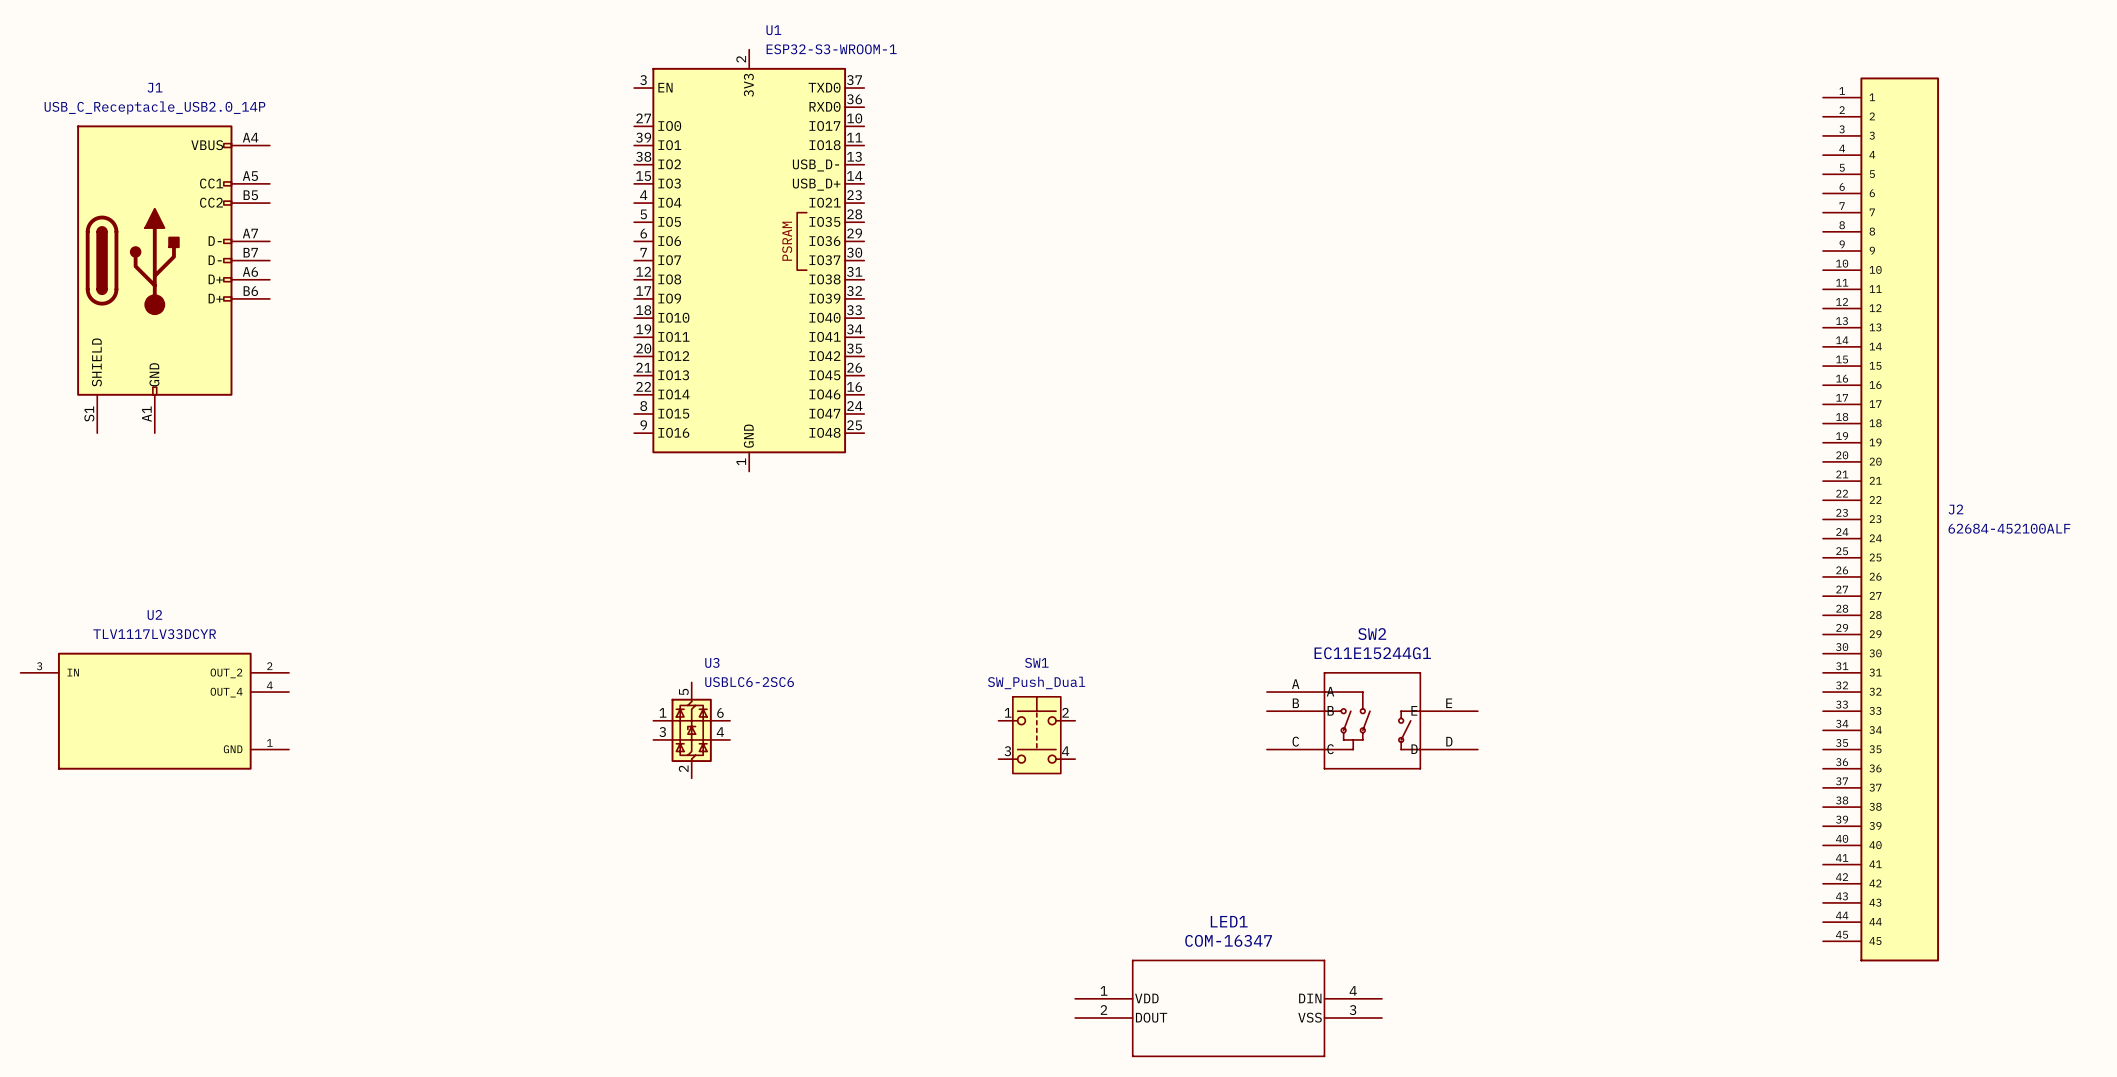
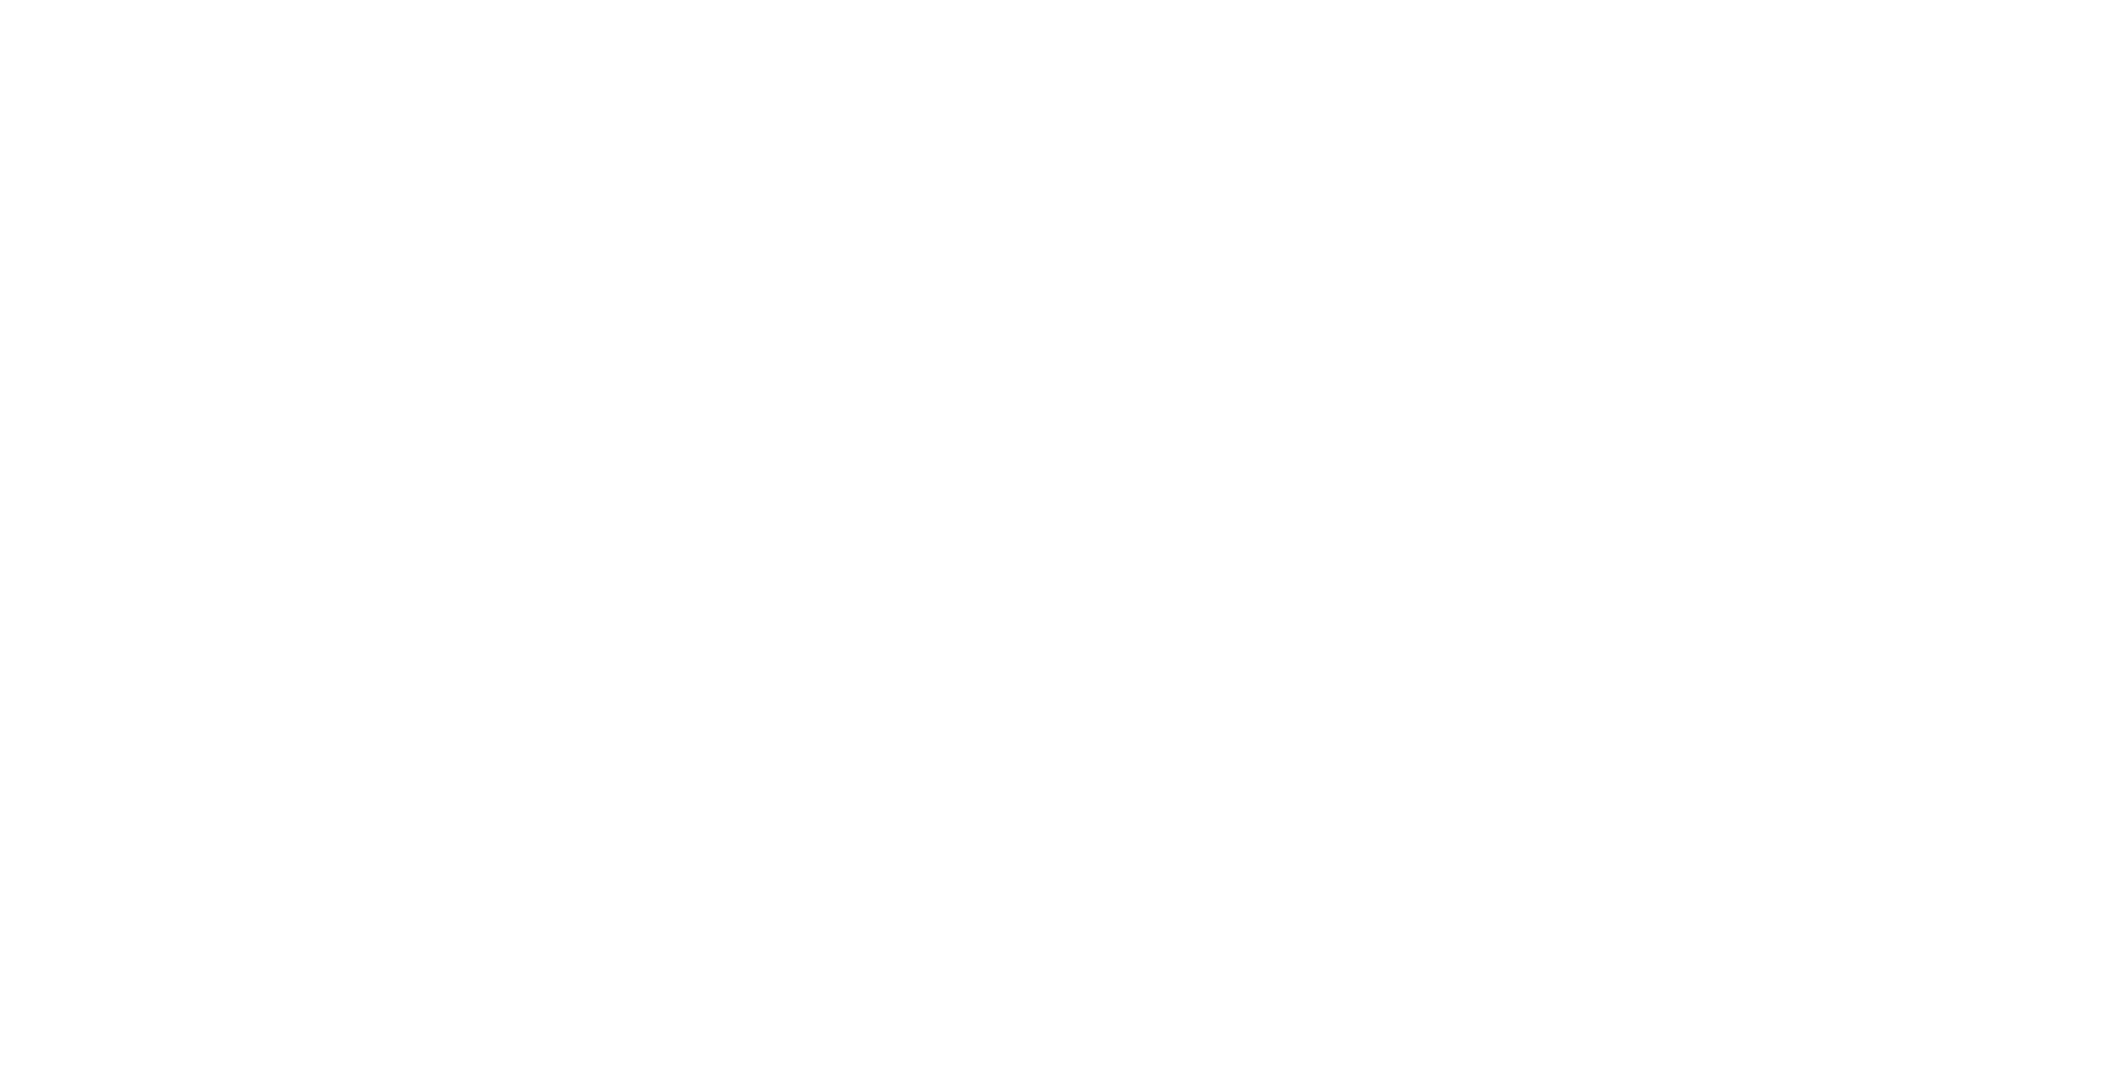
U1: ESP32-S3-WROOM-1 (749, 260) -> none
J1: USB_C_Receptacle_USB2.0_14P (173, 279) -> none
J2: 62684-452100ALF (1881, 519) -> none
U2: TLV1117LV33DCYR (154, 711) -> none
SW2: EC11E15244G1 (1372, 720) -> none
U3: USBLC6-2SC6 (691, 730) -> none
SW1: SW_Push_Dual (1036, 735) -> none
LED1: COM-16347 (1228, 1008) -> none

